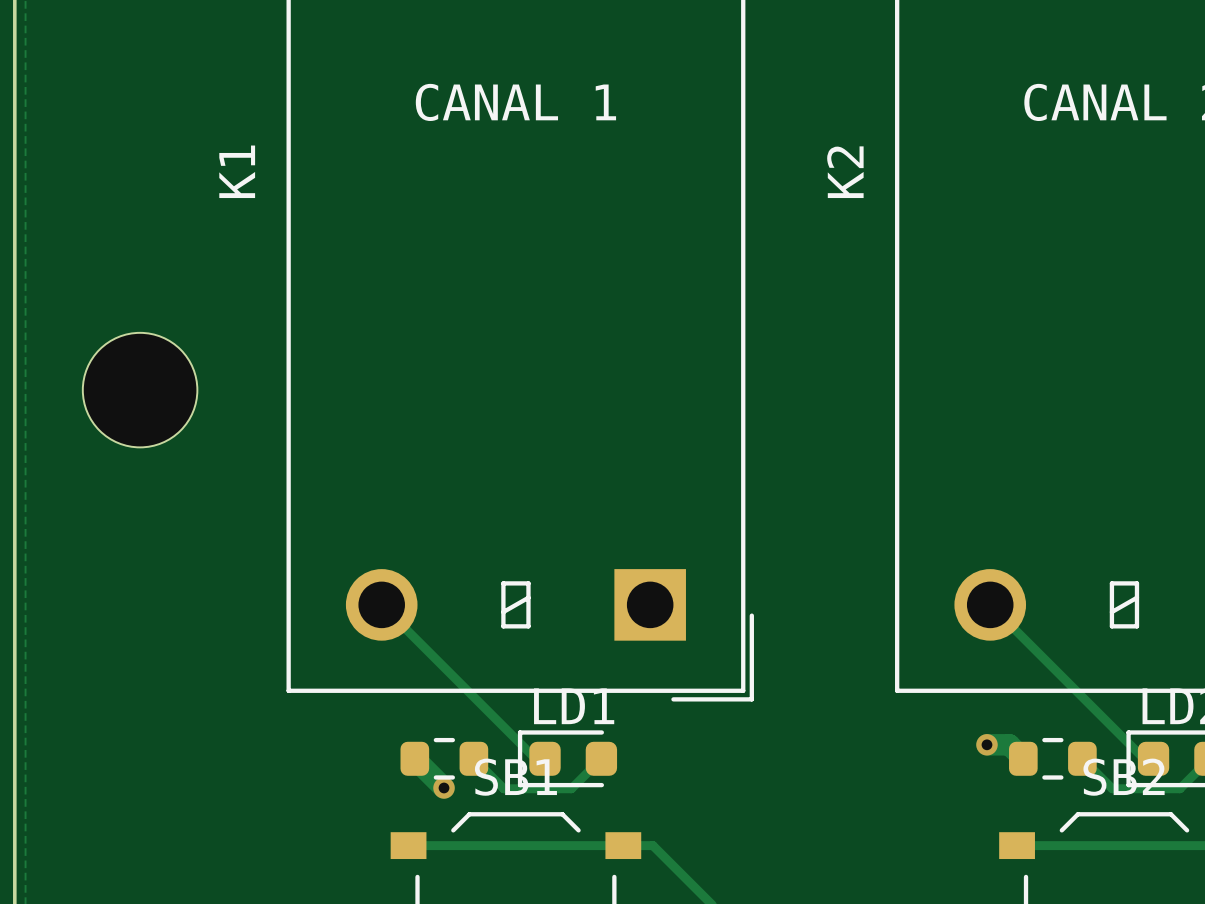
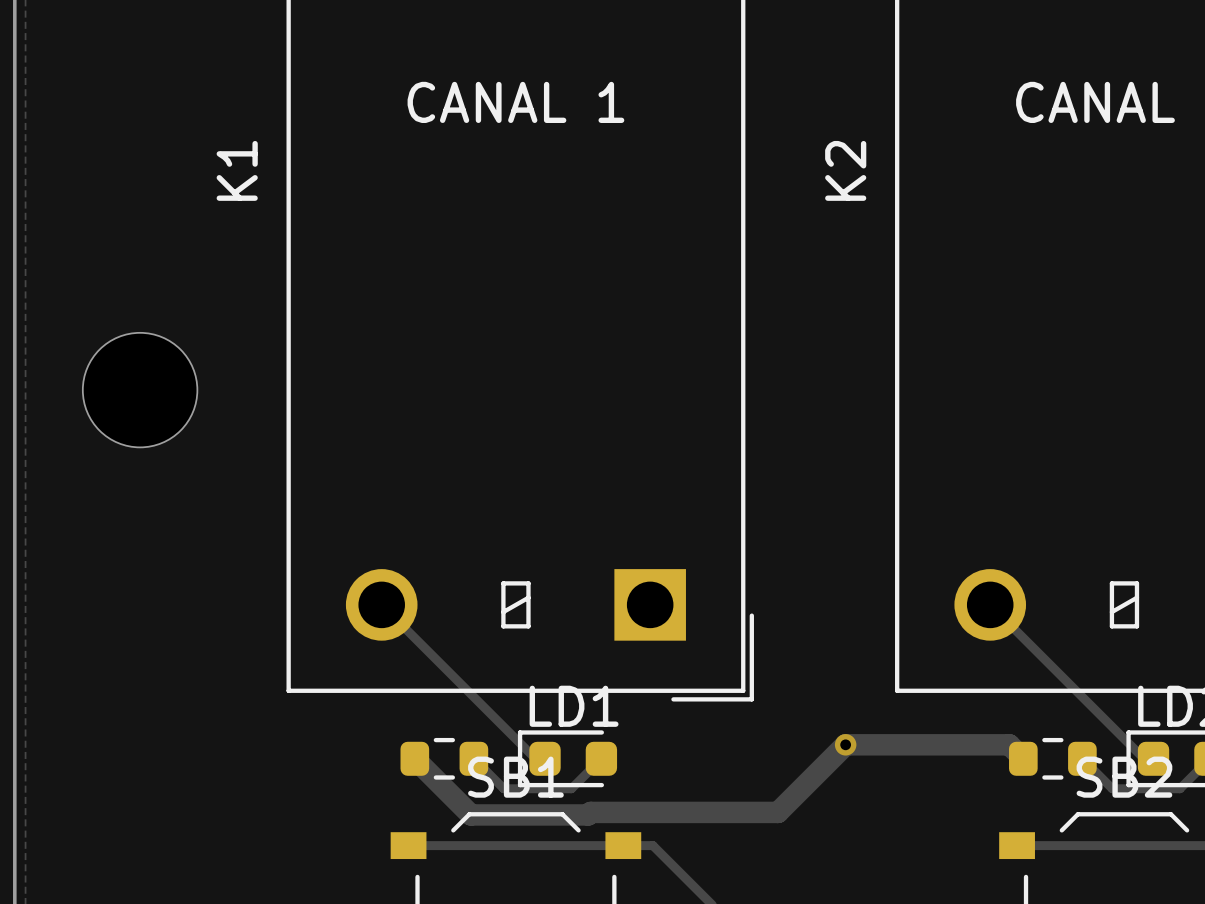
track: none -> (986, 744) (845, 744) (778, 812) (590, 812) (588, 814) (470, 814) (444, 787)
via position: (986, 744) -> (845, 744)
via: (444, 787) -> none

